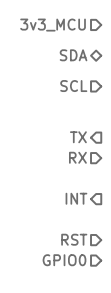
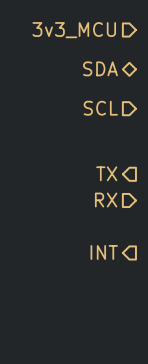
hierarchical label: RST (74, 239) -> none
hierarchical label: GPIO0 (64, 260) -> none

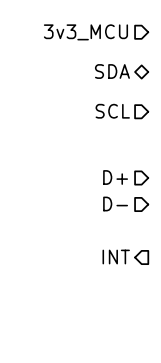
hierarchical label shape: output (106, 173) -> input (115, 177)
hierarchical label: TX (106, 173) -> D+ (115, 177)
hierarchical label: RX (106, 200) -> D- (115, 204)

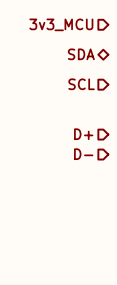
hierarchical label: INT (116, 257) -> none

